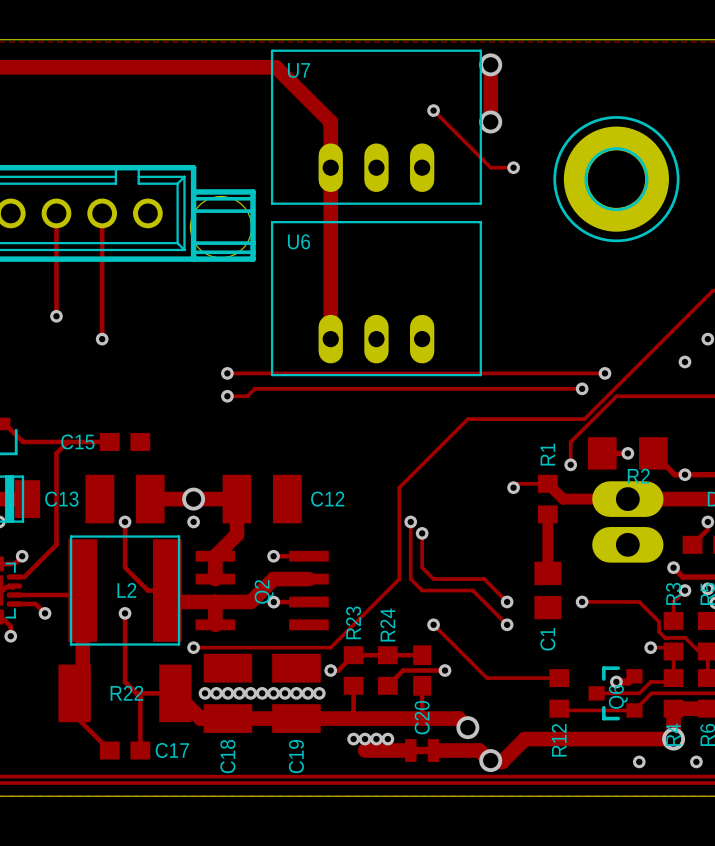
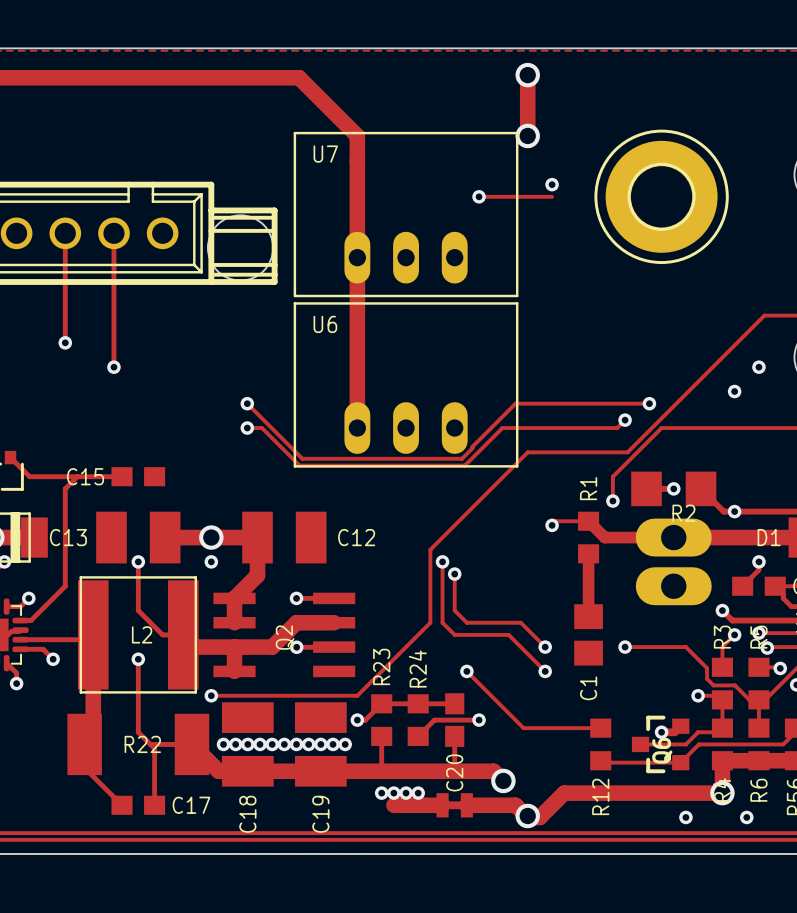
track: (433, 110) (490, 167) (513, 167) -> none
via position: (433, 110) -> (479, 196)
U7 position: (376, 127) -> (406, 214)
track: none -> (479, 196) (552, 196)
U6 position: (376, 298) -> (406, 384)
track: none -> (357, 367) (357, 428)
track: (227, 373) (479, 373) -> (247, 403) (302, 458) (462, 458) (515, 403)
track: (582, 388) (254, 388) (247, 396) (241, 396) -> (625, 420) (617, 428) (502, 428) (464, 465) (299, 465) (262, 428)
track: (490, 419) (467, 419) (399, 487) (399, 510) -> (527, 452) (430, 549)

